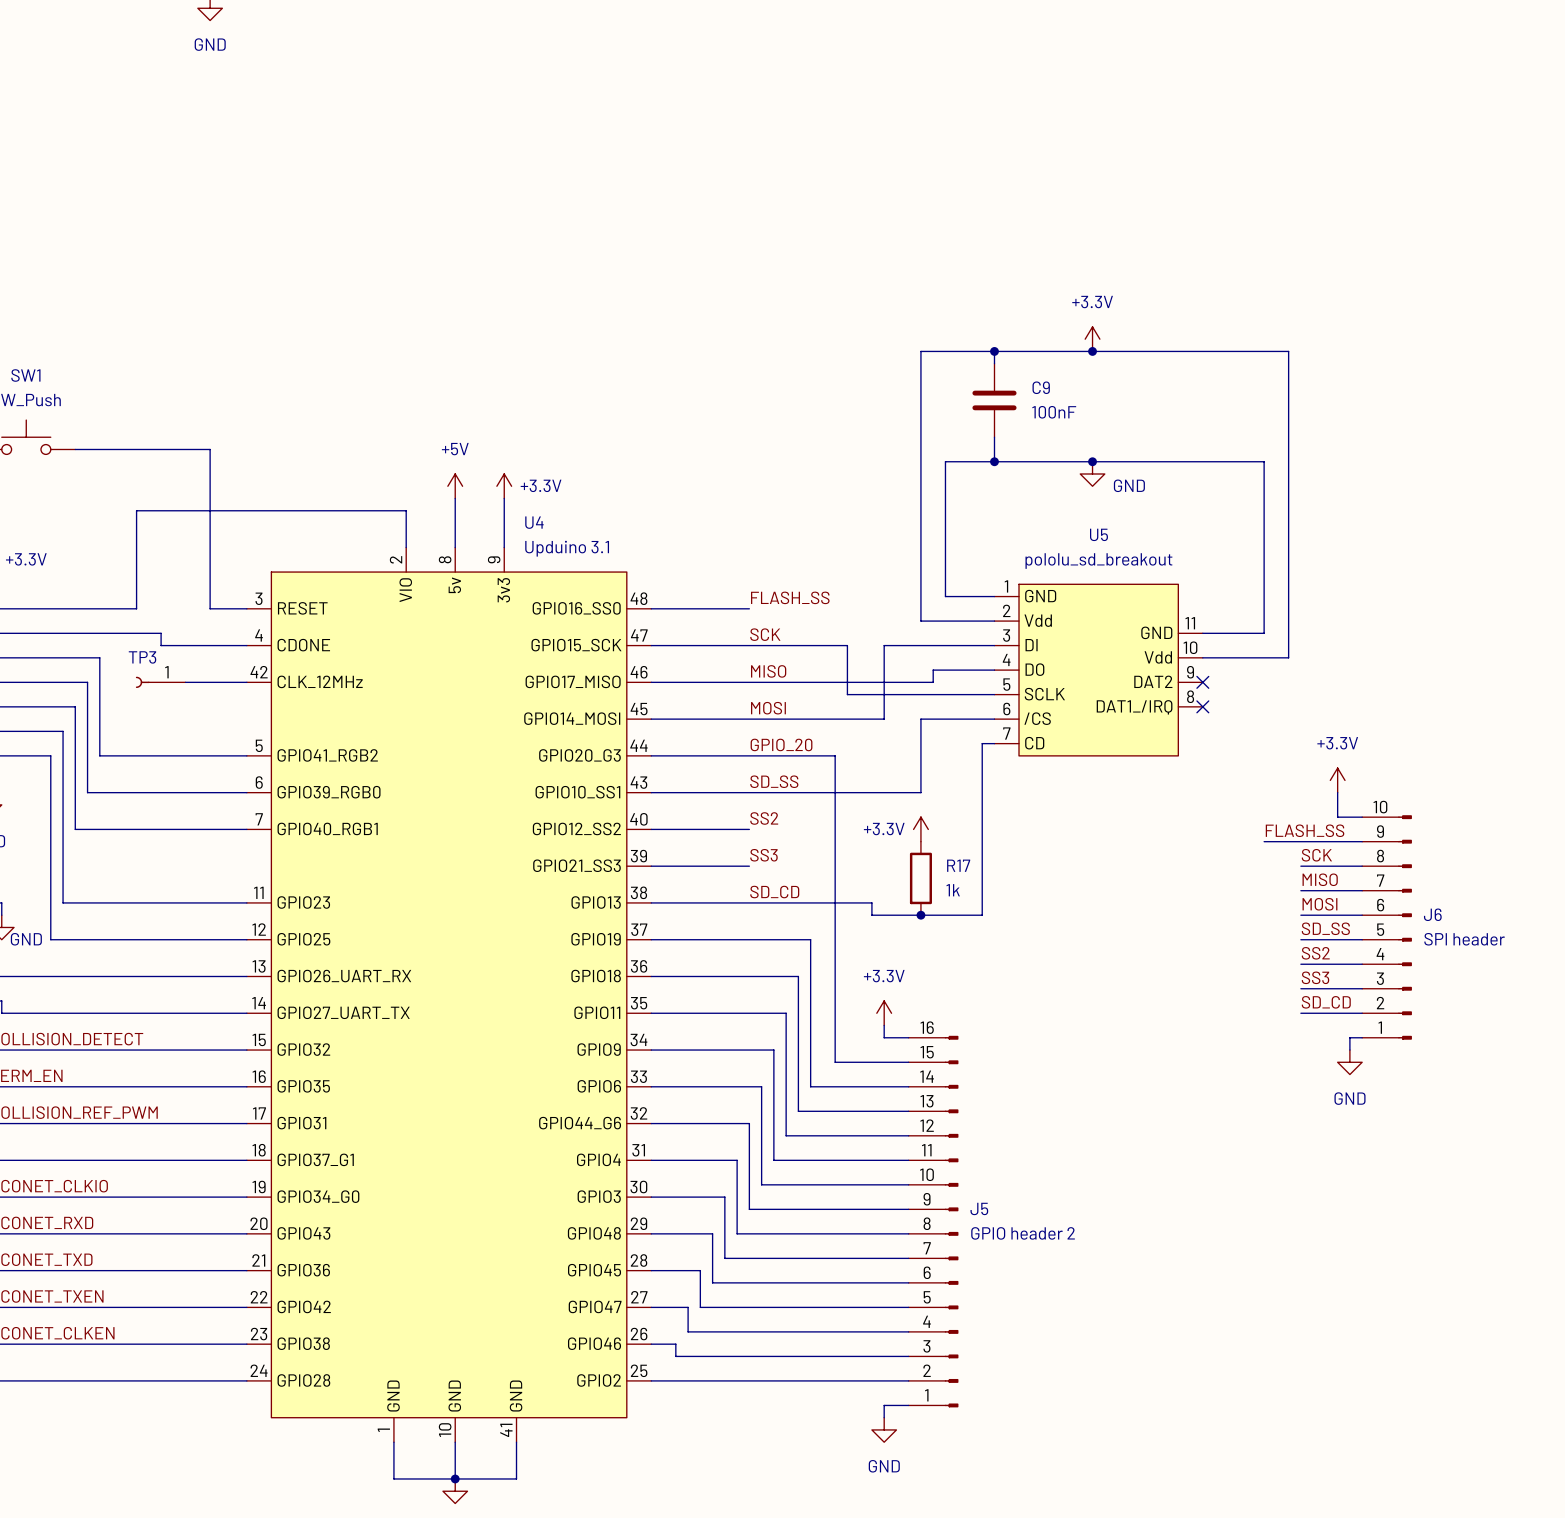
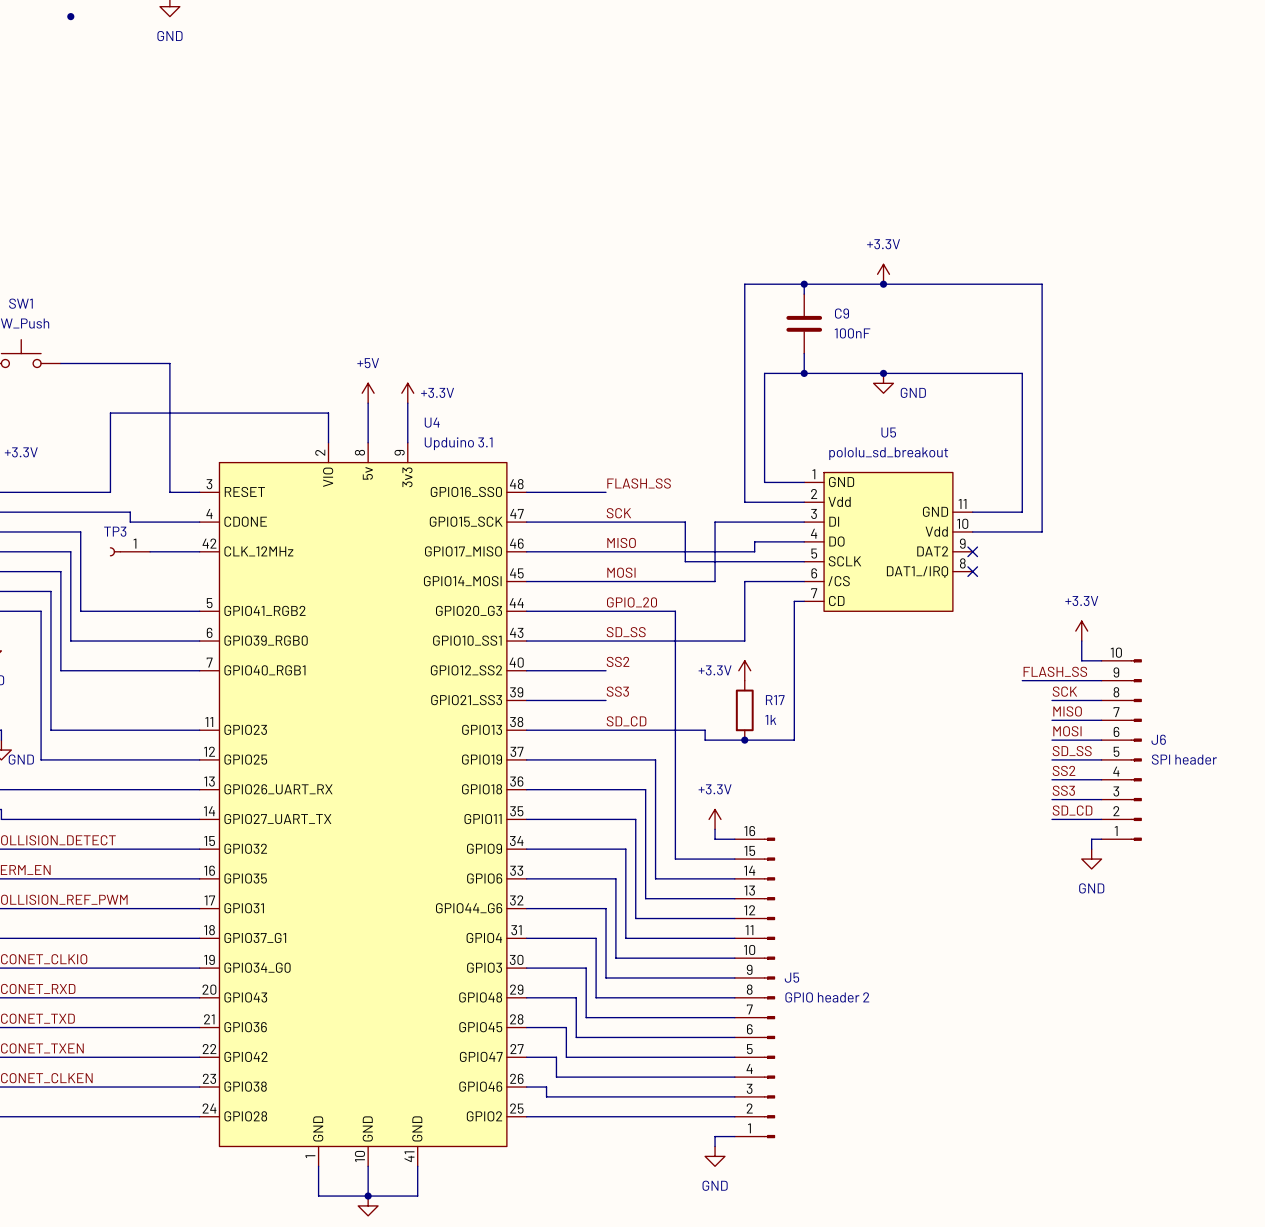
junction: none -> (70, 16)

